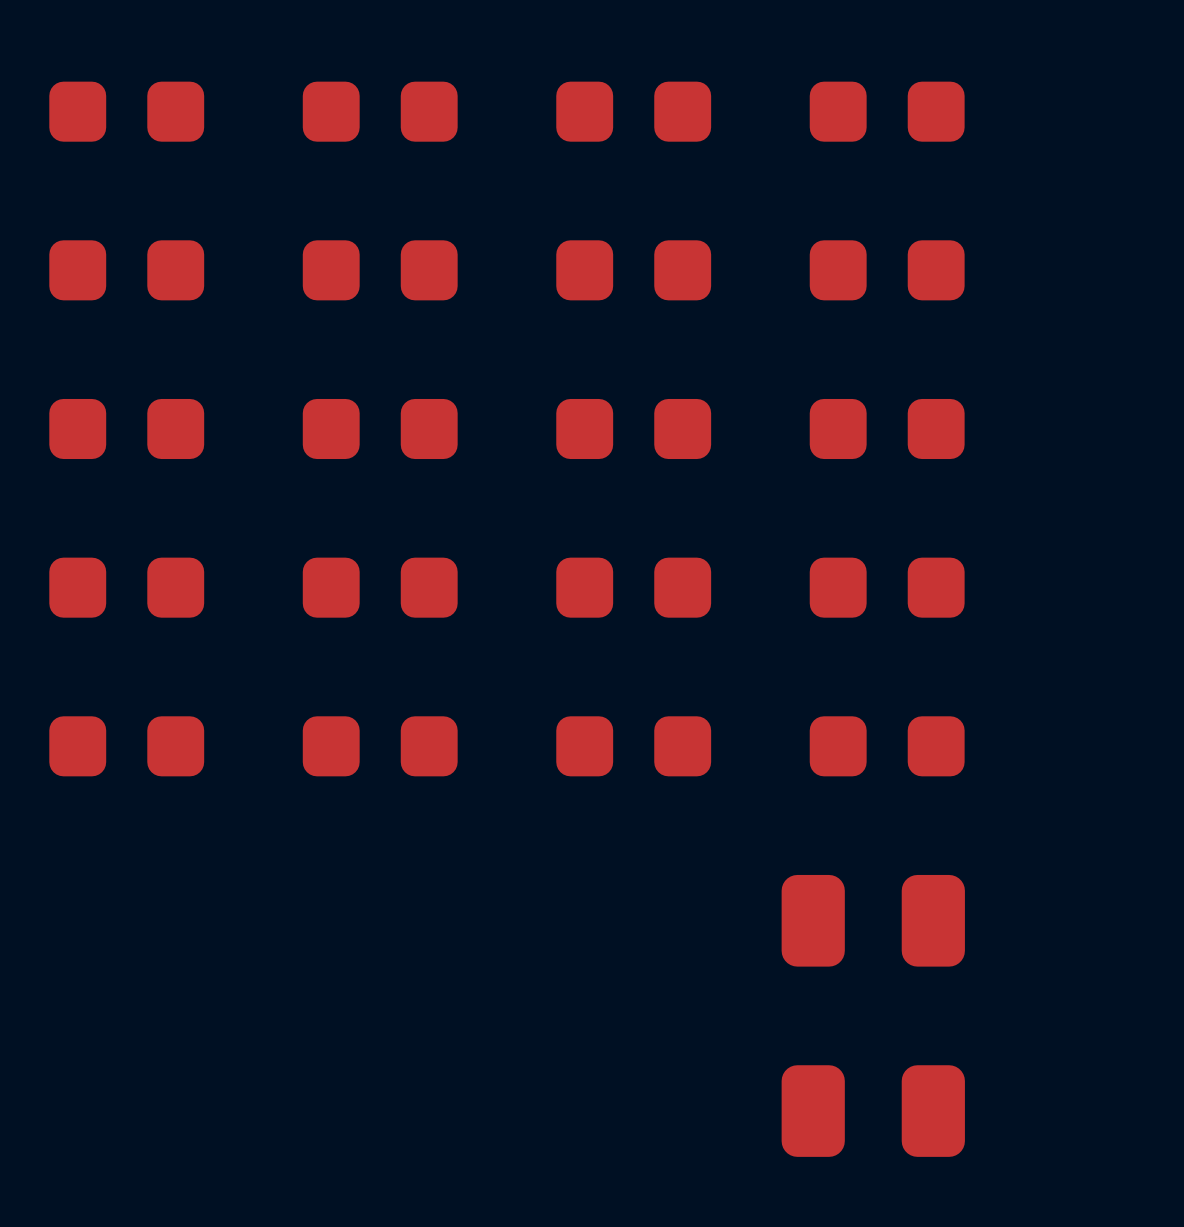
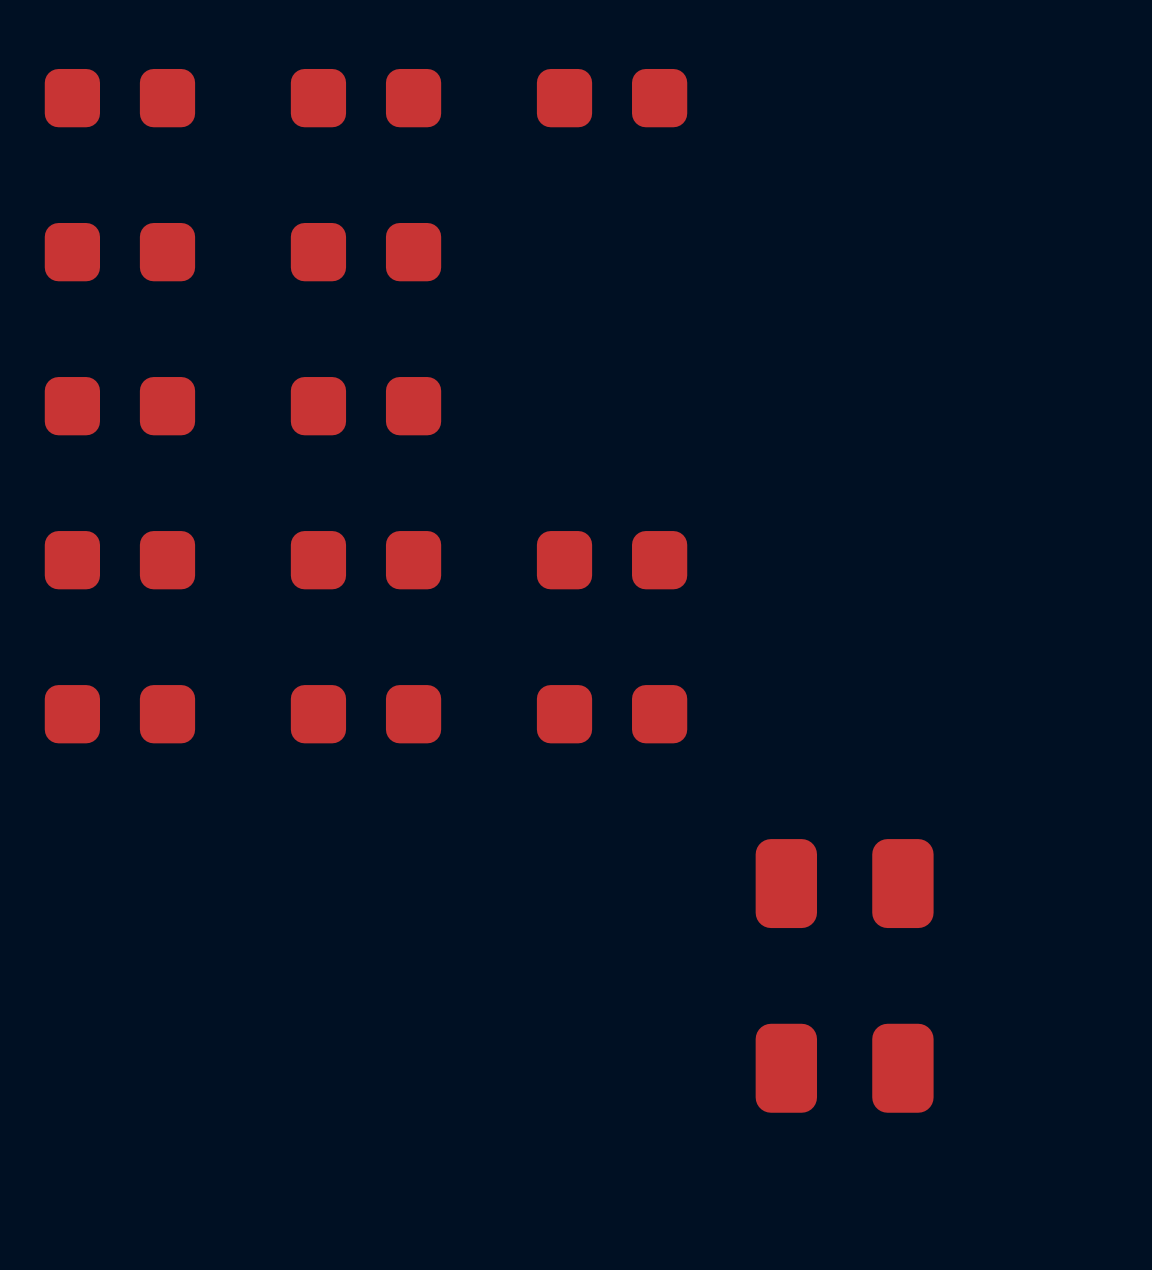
part: (887, 111) -> none
part: (633, 270) -> none
part: (887, 270) -> none
part: (633, 428) -> none
part: (887, 428) -> none
part: (887, 587) -> none
part: (887, 746) -> none

